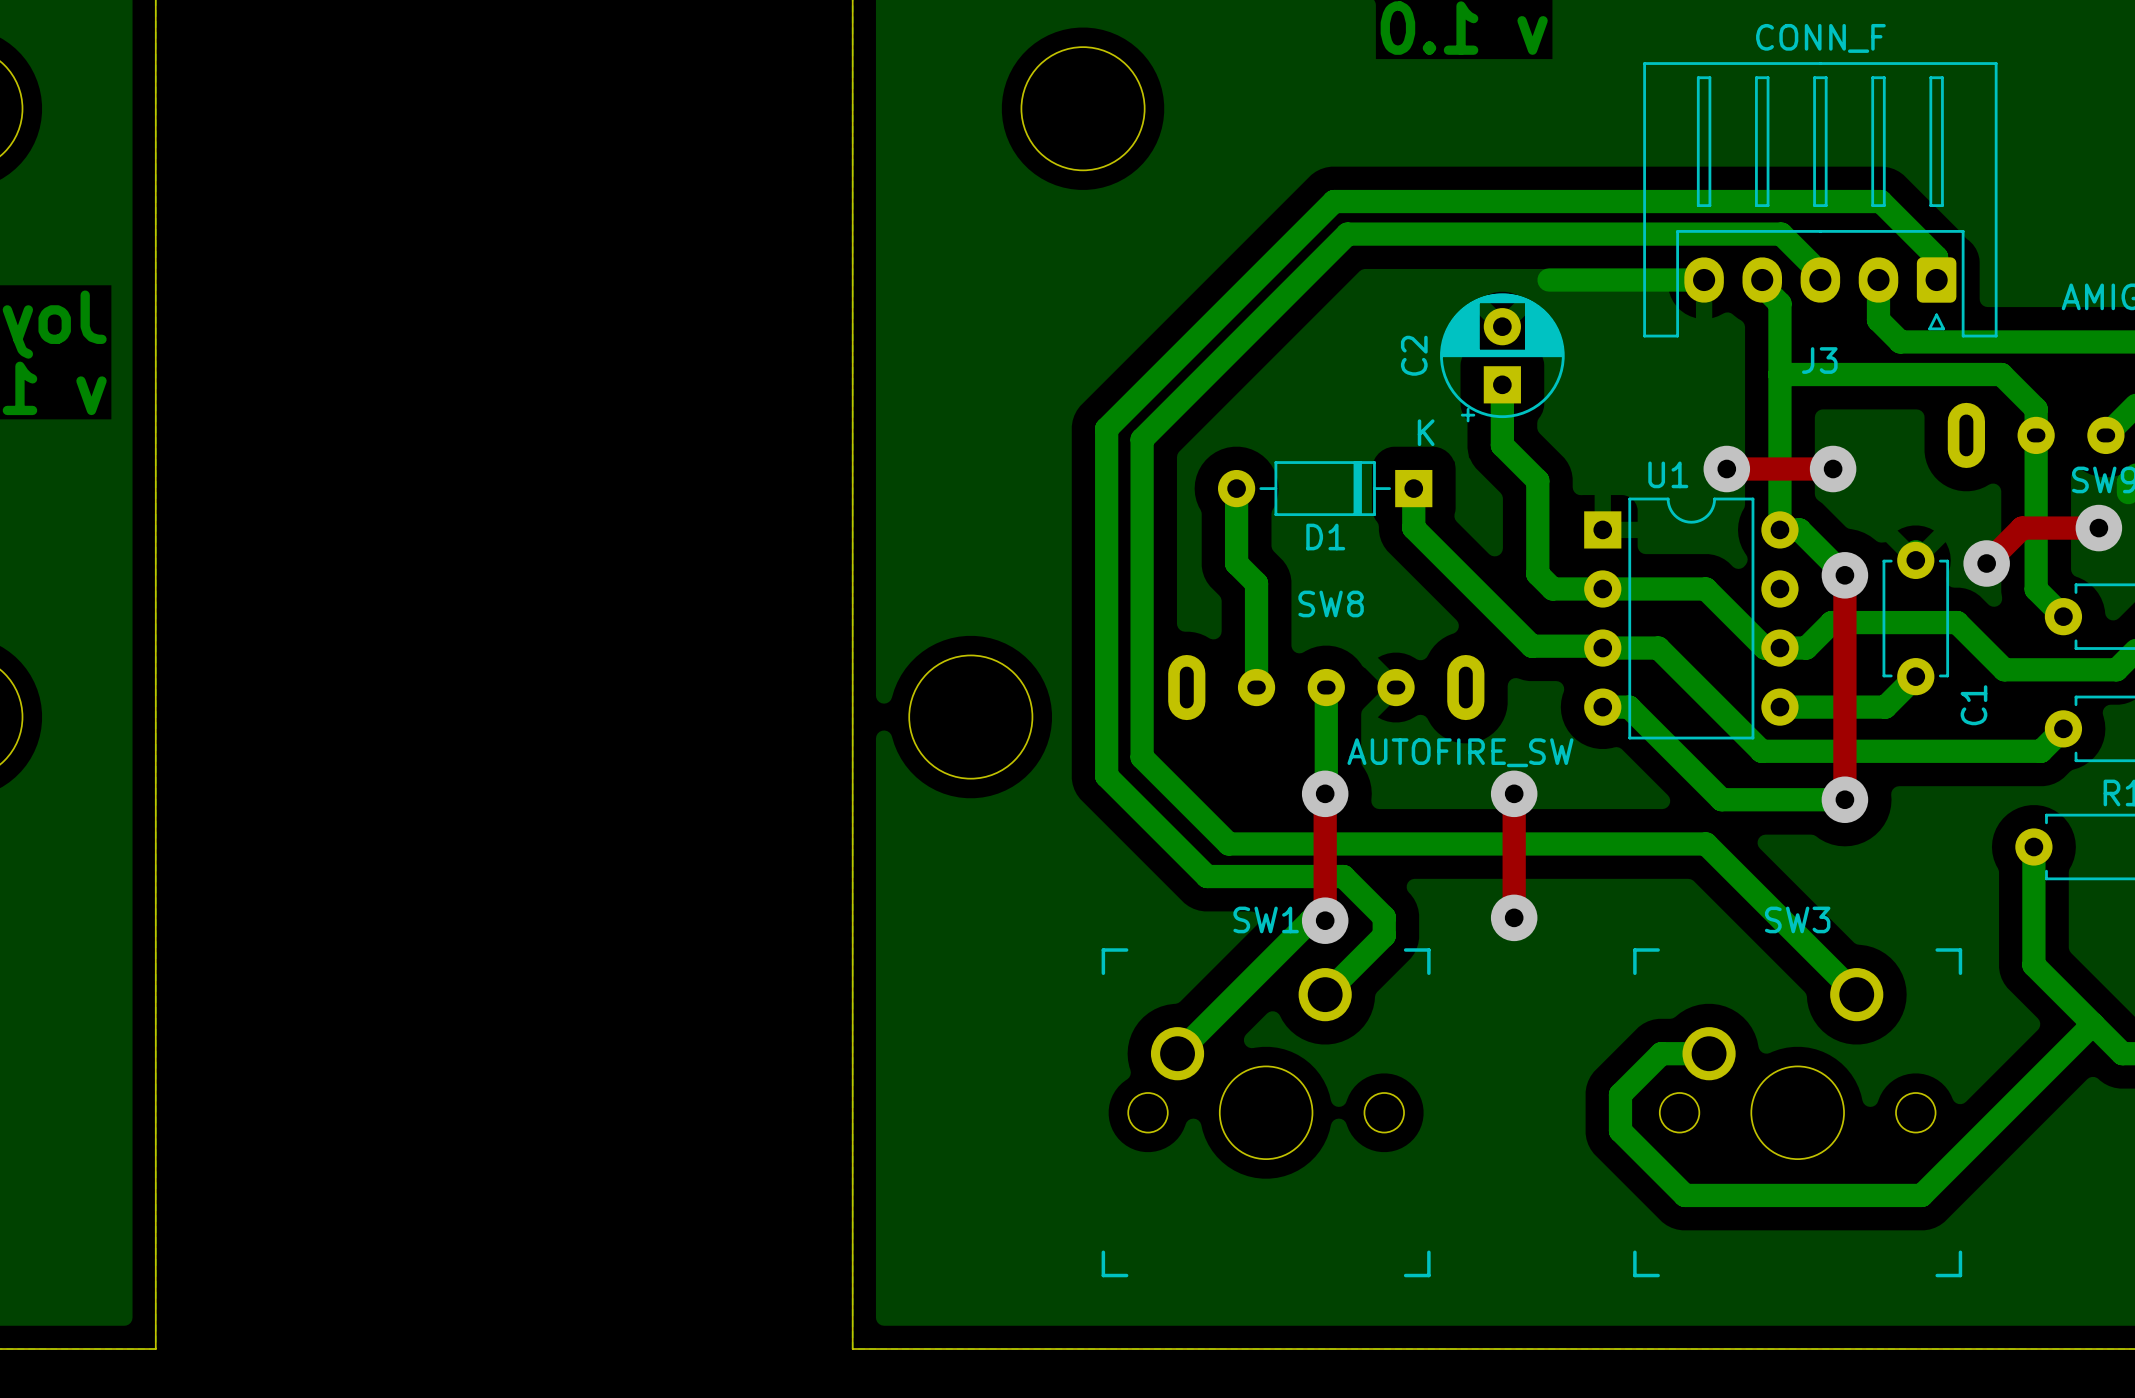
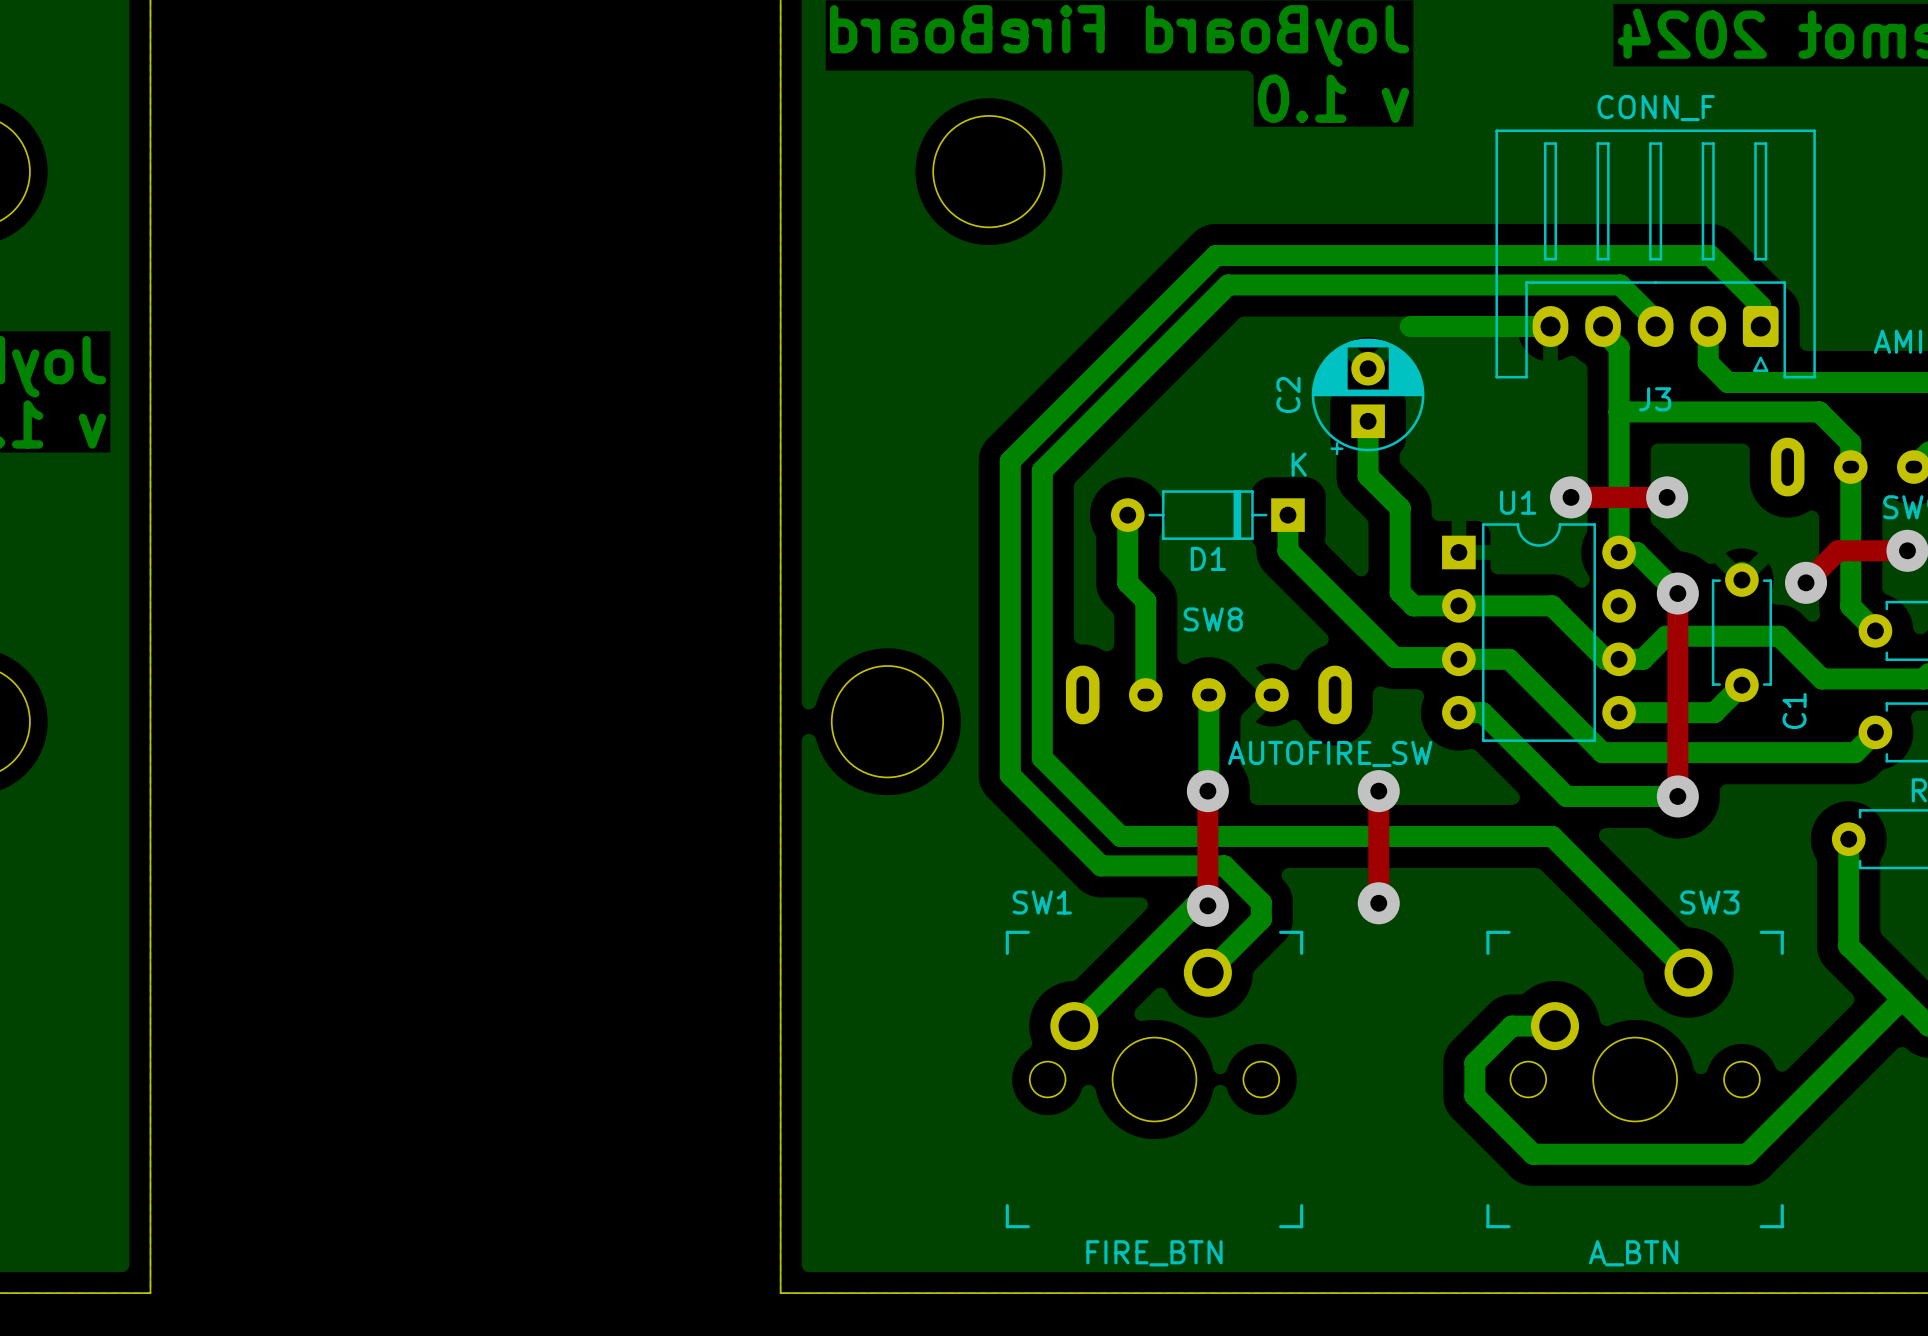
SW1 name position: SW1 (1266, 919) -> SW1 (1042, 902)
SW3 name position: SW3 (1797, 919) -> SW3 (1709, 902)
SW1 value: none -> FIRE_BTN (1154, 1253)
SW3 value: none -> A_BTN (1633, 1253)

